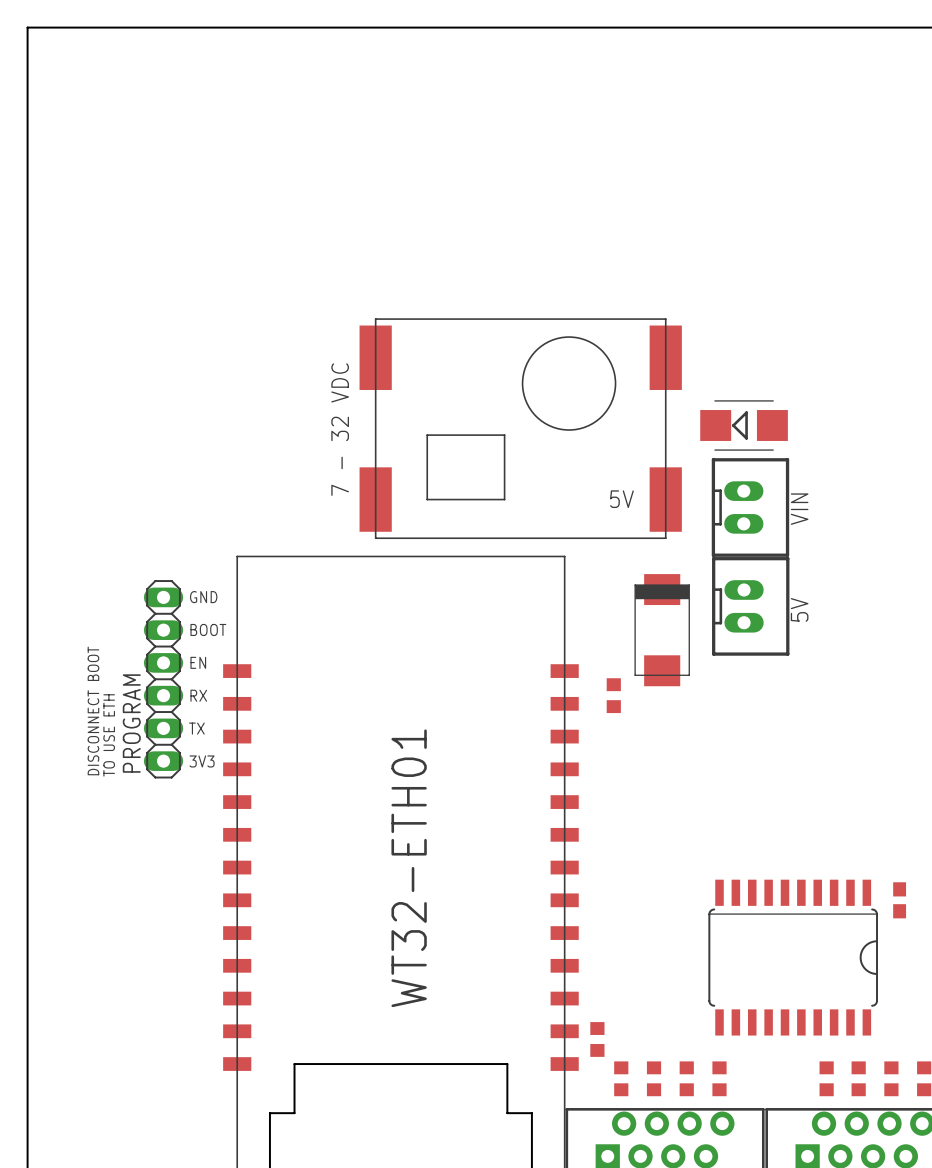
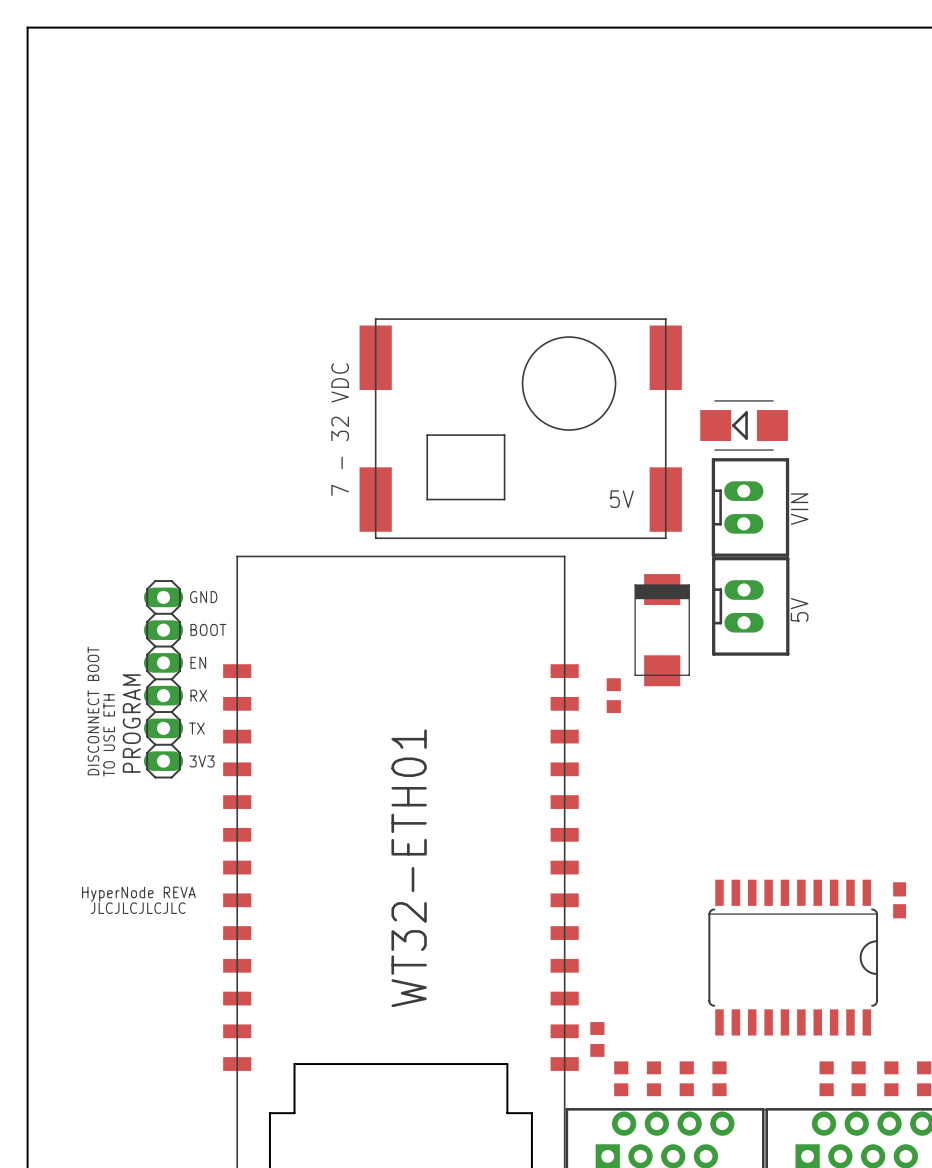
text: none -> HyperNode REVA (138, 894)
text: none -> JLCJLCJLCJLC (138, 908)

